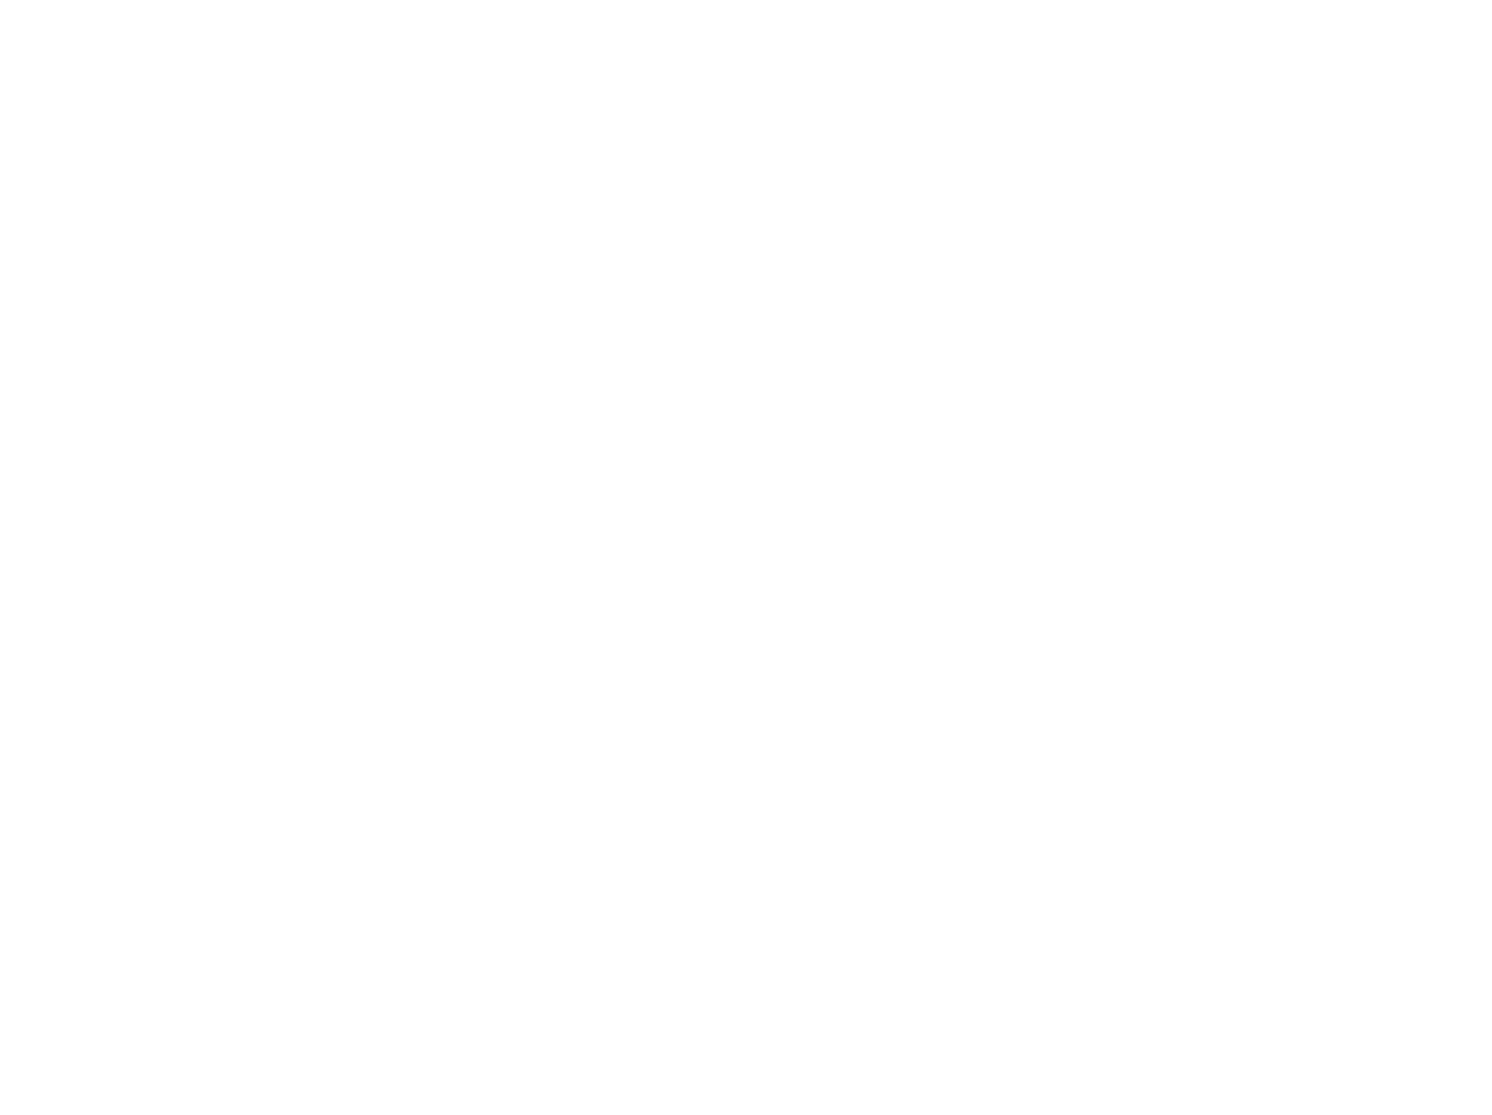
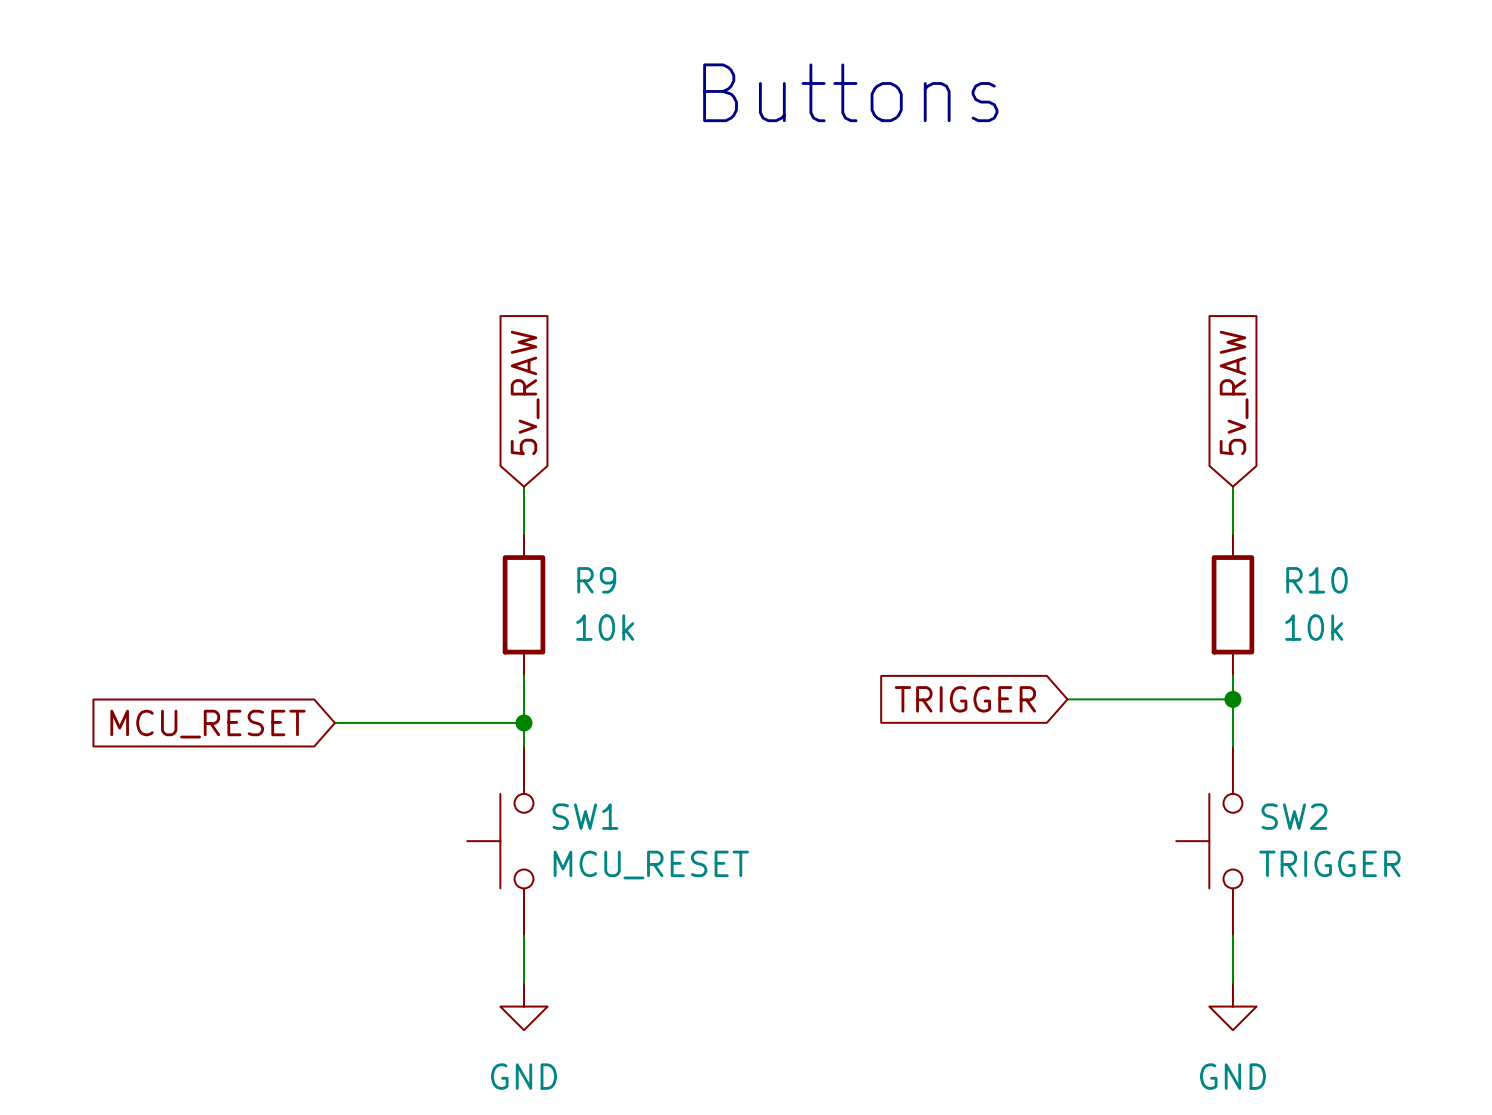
text: none -> Buttons (850, 92)
global label: none -> 5v_RAW (525, 392)
global label: none -> 5v_RAW (1234, 392)
wire: none -> (523, 486) (523, 533)
wire: none -> (1232, 486) (1232, 533)
R9: none -> 10k (523, 604)
R10: none -> 10k (1232, 604)
wire: none -> (523, 675) (523, 746)
wire: none -> (1232, 675) (1232, 746)
global label: none -> TRIGGER (965, 699)
wire: none -> (1067, 699) (1232, 699)
junction: none -> (1232, 699)
wire: none -> (334, 722) (523, 722)
junction: none -> (523, 722)
global label: none -> MCU_RESET (208, 724)
SW1: none -> MCU_RESET (500, 841)
SW2: none -> TRIGGER (1209, 841)
wire: none -> (523, 935) (523, 982)
wire: none -> (1232, 935) (1232, 982)
power symbol: none -> GND (523, 1006)
power symbol: none -> GND (1232, 1006)

